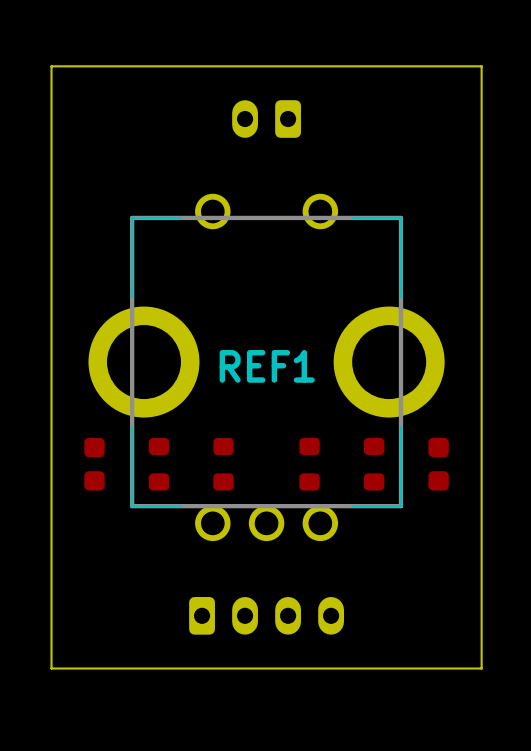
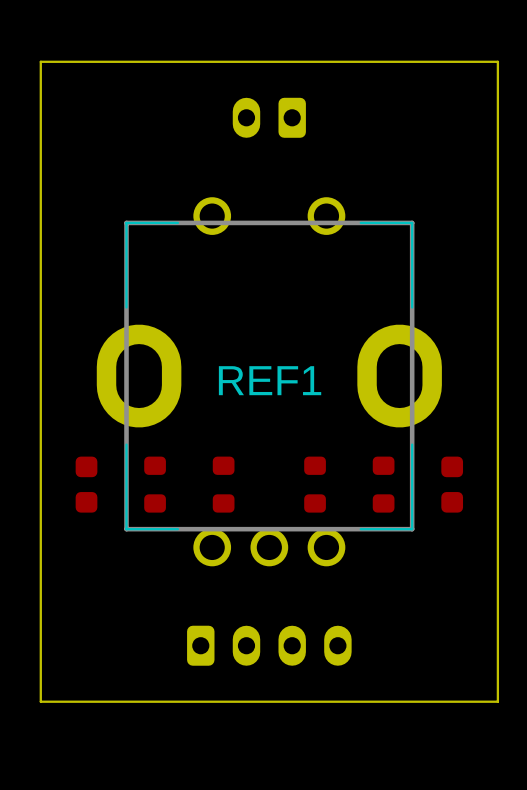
REF1 footprint: [88, 193, 445, 542] -> [96, 197, 442, 567]

